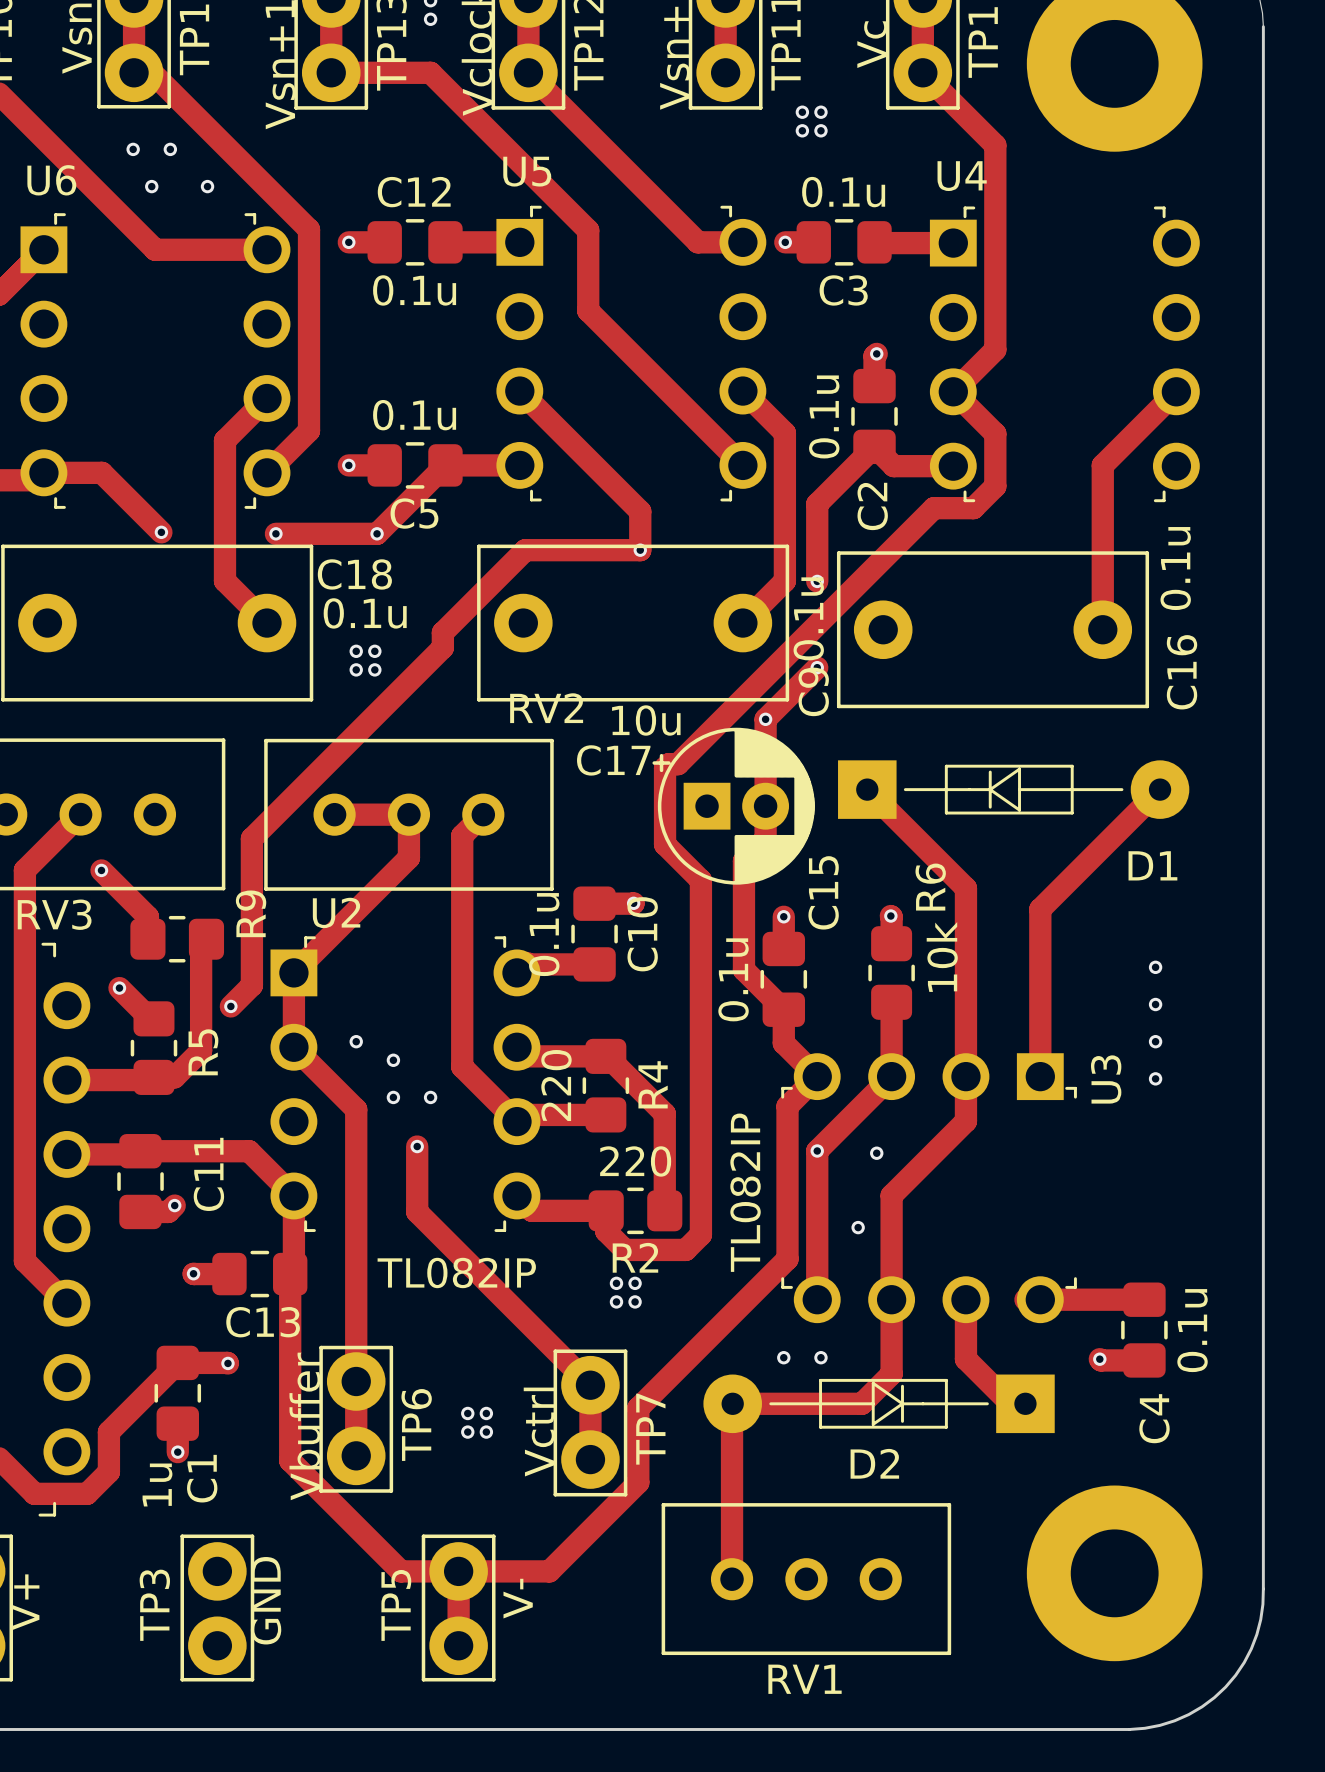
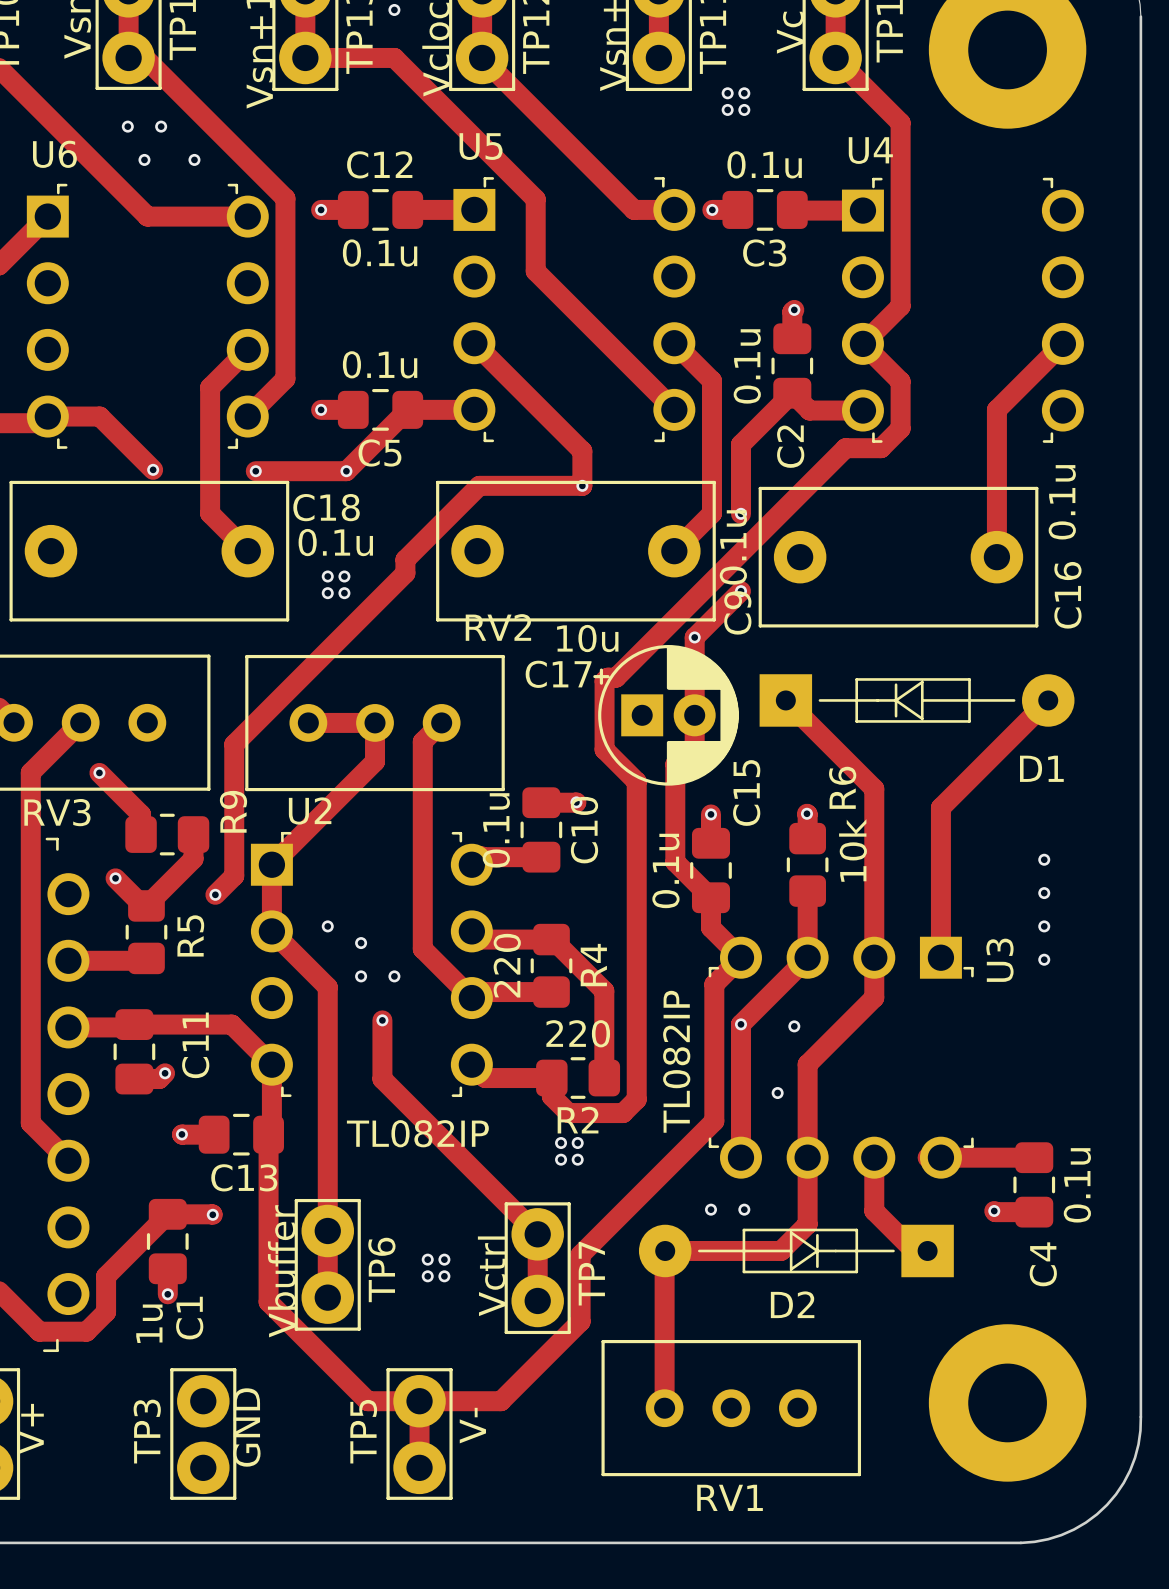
track: (206, 939) (201, 944) (201, 1050) (174, 1077) (153, 1077) -> (193, 834) (193, 858) (146, 905)

